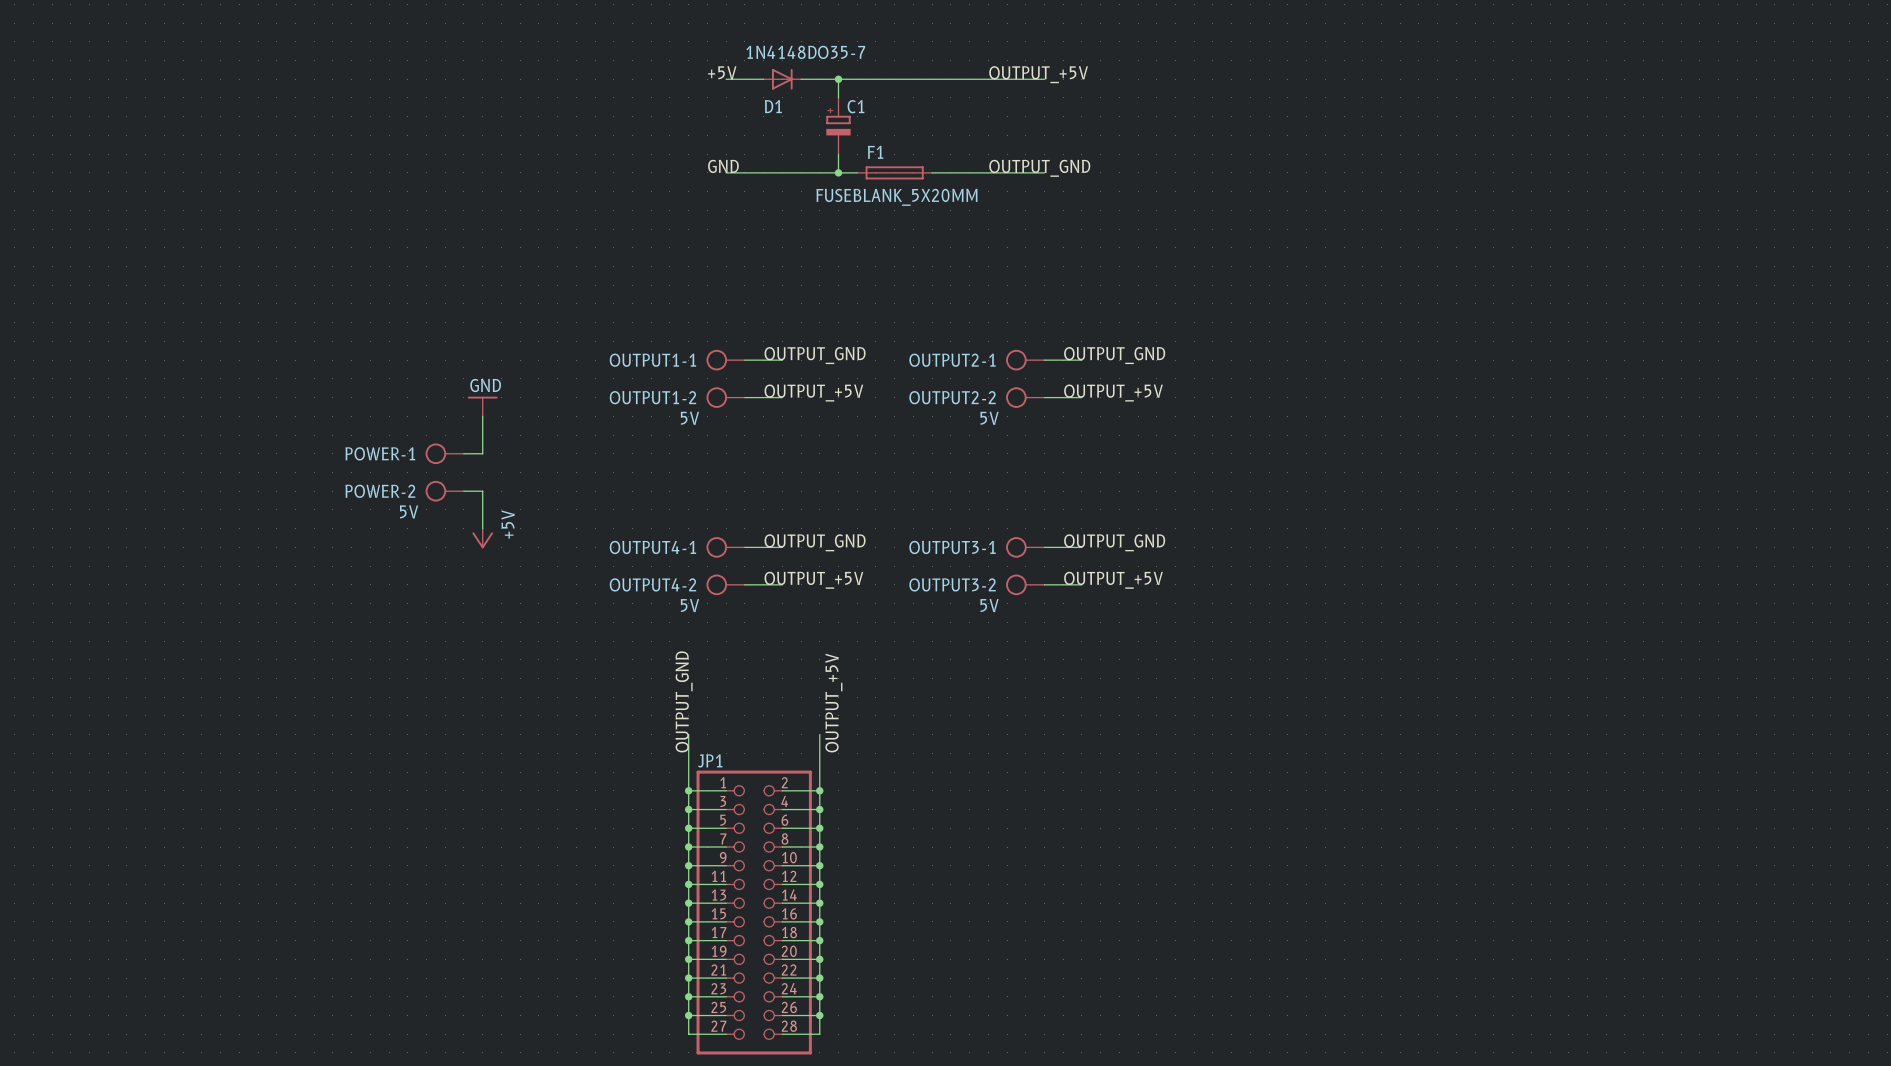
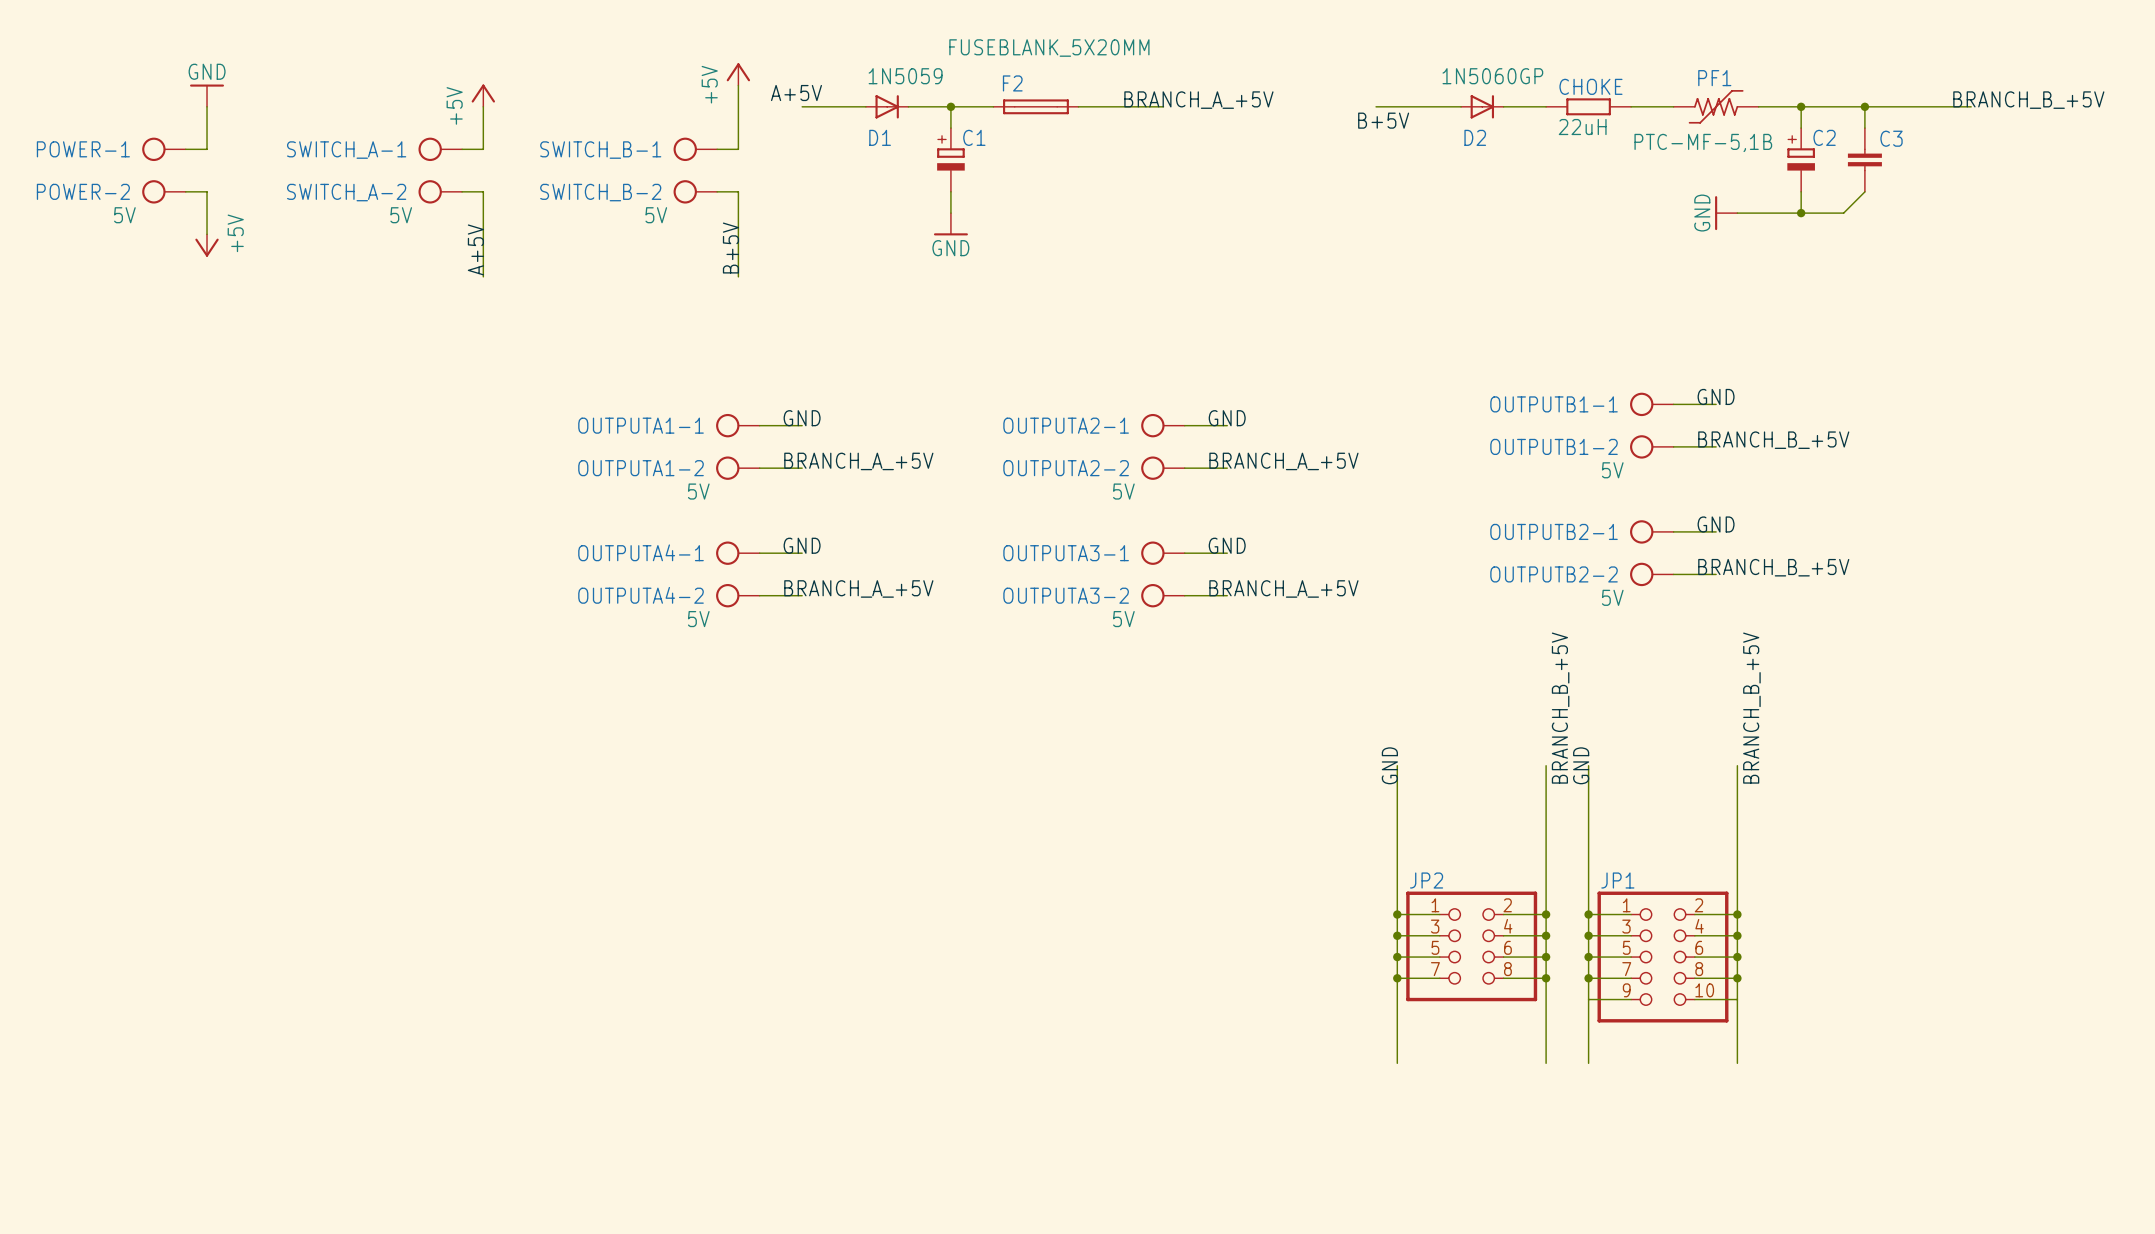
power symbol: none -> +5V (738, 74)
D1 value: 1N4148DO35-7 (805, 52) -> 1N5059 (905, 76)
wire: none -> (738, 85) (738, 149) (717, 149)
power symbol: none -> GND (207, 95)
power symbol: none -> +5V (483, 95)
label: +5V (722, 72) -> A+5V (796, 93)
label: OUTPUT_+5V (1038, 74) -> BRANCH_A_+5V (1198, 100)
label: none -> BRANCH_B_+5V (2028, 100)
wire: none -> (207, 106) (207, 149) (185, 149)
wire: none -> (483, 106) (483, 149) (462, 149)
wire: none -> (802, 106) (823, 106)
F2: none -> FUSEBLANK_5X20MM (1035, 106)
wire: (1025, 79) (1044, 79) -> none
wire: none -> (1376, 106) (1461, 106)
D2: none -> 1N5060GP (1482, 106)
wire: none -> (1503, 106) (1546, 106)
CHOKE: none -> 22uH (1588, 106)
wire: none -> (1631, 106) (1673, 106)
PF1: none -> PTC-MF-5,1B (1716, 106)
wire: none -> (1758, 106) (1971, 106)
wire: none -> (1801, 106) (1801, 128)
junction: none -> (1801, 106)
wire: none -> (1864, 106) (1864, 128)
junction: none -> (1864, 106)
label: none -> B+5V (1383, 120)
SWITCH_A-1: none -> (440, 149)
SWITCH_B-1: none -> (695, 149)
C2: none -> (1801, 159)
C3: none -> (1864, 159)
wire: none -> (185, 191) (207, 191) (207, 234)
SWITCH_A-2: none -> 5V (440, 191)
wire: none -> (462, 191) (483, 191) (483, 276)
SWITCH_B-2: none -> 5V (695, 191)
wire: none -> (717, 191) (738, 191) (738, 276)
wire: none -> (1801, 191) (1801, 213)
wire: none -> (1864, 191) (1843, 213) (1737, 213)
label: GND (723, 166) -> none
label: OUTPUT_GND (1039, 168) -> none
wire: (726, 172) (857, 172) -> none
junction: (838, 172) -> none
F1: FUSEBLANK_5X20MM (894, 172) -> none
wire: (932, 172) (1044, 172) -> none
power symbol: none -> GND (1726, 213)
junction: none -> (1801, 213)
power symbol: none -> GND (950, 224)
power symbol: none -> +5V (207, 245)
label: none -> B+5V (730, 248)
label: none -> A+5V (475, 249)
label: none -> GND (1716, 396)
OUTPUTB1-1: none -> (1651, 404)
wire: none -> (1673, 404) (1716, 404)
label: none -> GND (802, 418)
label: OUTPUT_GND (815, 355) -> none
label: OUTPUT_GND (1114, 355) -> GND (1227, 418)
OUTPUTA1-1: none -> (737, 425)
OUTPUT1-1: (725, 360) -> none
wire: (744, 360) (782, 360) -> (759, 425) (802, 425)
OUTPUT2-1 name: OUTPUT2-1 (952, 360) -> OUTPUTA2-1 (1066, 425)
label: none -> BRANCH_B_+5V (1773, 440)
OUTPUTB1-2: none -> 5V (1651, 446)
wire: none -> (1673, 446) (1716, 446)
label: none -> BRANCH_A_+5V (858, 461)
label: OUTPUT_+5V (813, 393) -> none
label: OUTPUT_+5V (1113, 393) -> BRANCH_A_+5V (1283, 461)
OUTPUTA1-2: none -> 5V (737, 468)
OUTPUT1-2: 5V (725, 397) -> none
wire: (744, 397) (782, 397) -> (759, 468) (802, 468)
OUTPUT2-2 name: OUTPUT2-2 (952, 397) -> OUTPUTA2-2 (1066, 468)
power symbol: GND (482, 406) -> none
wire: (482, 416) (482, 453) (463, 453) -> none
label: none -> GND (1716, 524)
POWER-1 position: (444, 453) -> (163, 149)
OUTPUTB2-1: none -> (1651, 531)
wire: none -> (1673, 531) (1716, 531)
label: none -> GND (802, 545)
label: none -> GND (1227, 545)
OUTPUTA4-1: none -> (737, 553)
OUTPUTA3-1: none -> (1162, 553)
label: none -> BRANCH_B_+5V (1773, 567)
POWER-2 position: (444, 491) -> (163, 191)
wire: (463, 491) (482, 491) (482, 528) -> none
OUTPUTB2-2: none -> 5V (1651, 574)
wire: none -> (1673, 574) (1716, 574)
label: none -> BRANCH_A_+5V (858, 588)
label: none -> BRANCH_A_+5V (1283, 588)
OUTPUTA4-2: none -> 5V (737, 595)
OUTPUTA3-2: none -> 5V (1162, 595)
power symbol: +5V (482, 538) -> none
label: OUTPUT_GND (815, 542) -> none
label: OUTPUT_GND (1114, 542) -> none
OUTPUT4-1: (725, 547) -> none
wire: (744, 547) (782, 547) -> (759, 595) (802, 595)
OUTPUT3-1: (1025, 547) -> none
wire: (1044, 547) (1081, 547) -> (1184, 553) (1227, 553)
label: OUTPUT_+5V (813, 580) -> none
label: OUTPUT_+5V (1113, 580) -> none
OUTPUT4-2: 5V (725, 584) -> none
wire: (744, 584) (782, 584) -> (759, 553) (802, 553)
OUTPUT3-2: 5V (1025, 584) -> none
wire: (1044, 584) (1081, 584) -> (1184, 595) (1227, 595)
label: none -> BRANCH_B_+5V (1560, 708)
label: none -> BRANCH_B_+5V (1751, 708)
wire: none -> (1397, 765) (1397, 1063)
wire: none -> (1546, 765) (1546, 1063)
wire: none -> (1588, 765) (1588, 1063)
wire: none -> (1737, 765) (1737, 1063)
label: none -> GND (1389, 765)
label: none -> GND (1581, 765)
label: OUTPUT_GND (684, 701) -> none
label: OUTPUT_+5V (833, 703) -> none
wire: (688, 734) (688, 1034) (726, 1034) -> none
wire: (819, 734) (819, 1034) (782, 1034) -> none
JP1 name position: JP1 (710, 760) -> JP1 (1617, 880)
JP1 symbol: [696, 770, 812, 1055] -> [1597, 891, 1729, 1023]
wire: (688, 790) (726, 790) -> none
junction: (688, 790) -> none
wire: (782, 790) (819, 790) -> none
junction: (819, 790) -> none
wire: none -> (1397, 914) (1439, 914)
junction: none -> (1397, 914)
wire: none -> (1503, 914) (1546, 914)
junction: none -> (1546, 914)
wire: none -> (1588, 914) (1631, 914)
junction: none -> (1588, 914)
wire: none -> (1694, 914) (1737, 914)
junction: none -> (1737, 914)
wire: (688, 809) (726, 809) -> none
junction: (688, 809) -> none
wire: (782, 809) (819, 809) -> none
junction: (819, 809) -> none
wire: none -> (1397, 935) (1439, 935)
junction: none -> (1397, 935)
wire: none -> (1503, 935) (1546, 935)
junction: none -> (1546, 935)
wire: none -> (1588, 935) (1631, 935)
junction: none -> (1588, 935)
wire: none -> (1694, 935) (1737, 935)
junction: none -> (1737, 935)
JP2: none -> (1471, 946)
wire: (688, 828) (726, 828) -> none
junction: (688, 828) -> none
wire: (782, 828) (819, 828) -> none
junction: (819, 828) -> none
wire: none -> (1397, 957) (1439, 957)
junction: none -> (1397, 957)
wire: none -> (1503, 957) (1546, 957)
junction: none -> (1546, 957)
wire: none -> (1588, 957) (1631, 957)
junction: none -> (1588, 957)
wire: none -> (1694, 957) (1737, 957)
junction: none -> (1737, 957)
wire: (688, 847) (726, 847) -> none
junction: (688, 847) -> none
wire: (782, 847) (819, 847) -> none
junction: (819, 847) -> none
wire: none -> (1397, 978) (1439, 978)
junction: none -> (1397, 978)
wire: none -> (1503, 978) (1546, 978)
junction: none -> (1546, 978)
wire: none -> (1588, 978) (1631, 978)
junction: none -> (1588, 978)
wire: none -> (1694, 978) (1737, 978)
junction: none -> (1737, 978)
wire: (688, 865) (726, 865) -> none
junction: (688, 865) -> none
wire: (782, 865) (819, 865) -> none
junction: (819, 865) -> none
wire: none -> (1588, 999) (1631, 999)
wire: none -> (1694, 999) (1737, 999)
wire: (688, 884) (726, 884) -> none
junction: (688, 884) -> none
wire: (782, 884) (819, 884) -> none
junction: (819, 884) -> none
wire: (688, 903) (726, 903) -> none
junction: (688, 903) -> none
wire: (782, 903) (819, 903) -> none
junction: (819, 903) -> none
wire: (688, 921) (726, 921) -> none
junction: (688, 921) -> none
wire: (782, 921) (819, 921) -> none
junction: (819, 921) -> none
wire: (688, 940) (726, 940) -> none
junction: (688, 940) -> none
wire: (782, 940) (819, 940) -> none
junction: (819, 940) -> none
wire: (688, 959) (726, 959) -> none
junction: (688, 959) -> none
wire: (782, 959) (819, 959) -> none
junction: (819, 959) -> none
wire: (688, 978) (726, 978) -> none
junction: (688, 978) -> none
wire: (782, 978) (819, 978) -> none
junction: (819, 978) -> none
wire: (688, 996) (726, 996) -> none
junction: (688, 996) -> none
wire: (782, 996) (819, 996) -> none
junction: (819, 996) -> none
wire: (688, 1015) (726, 1015) -> none
junction: (688, 1015) -> none
wire: (782, 1015) (819, 1015) -> none
junction: (819, 1015) -> none

